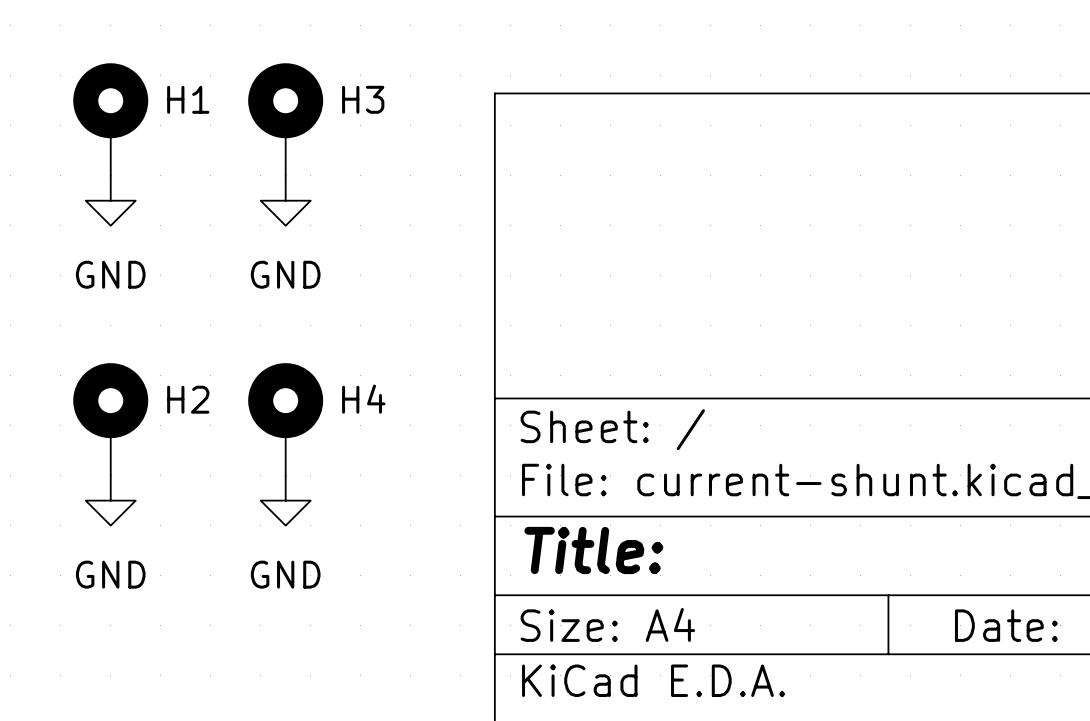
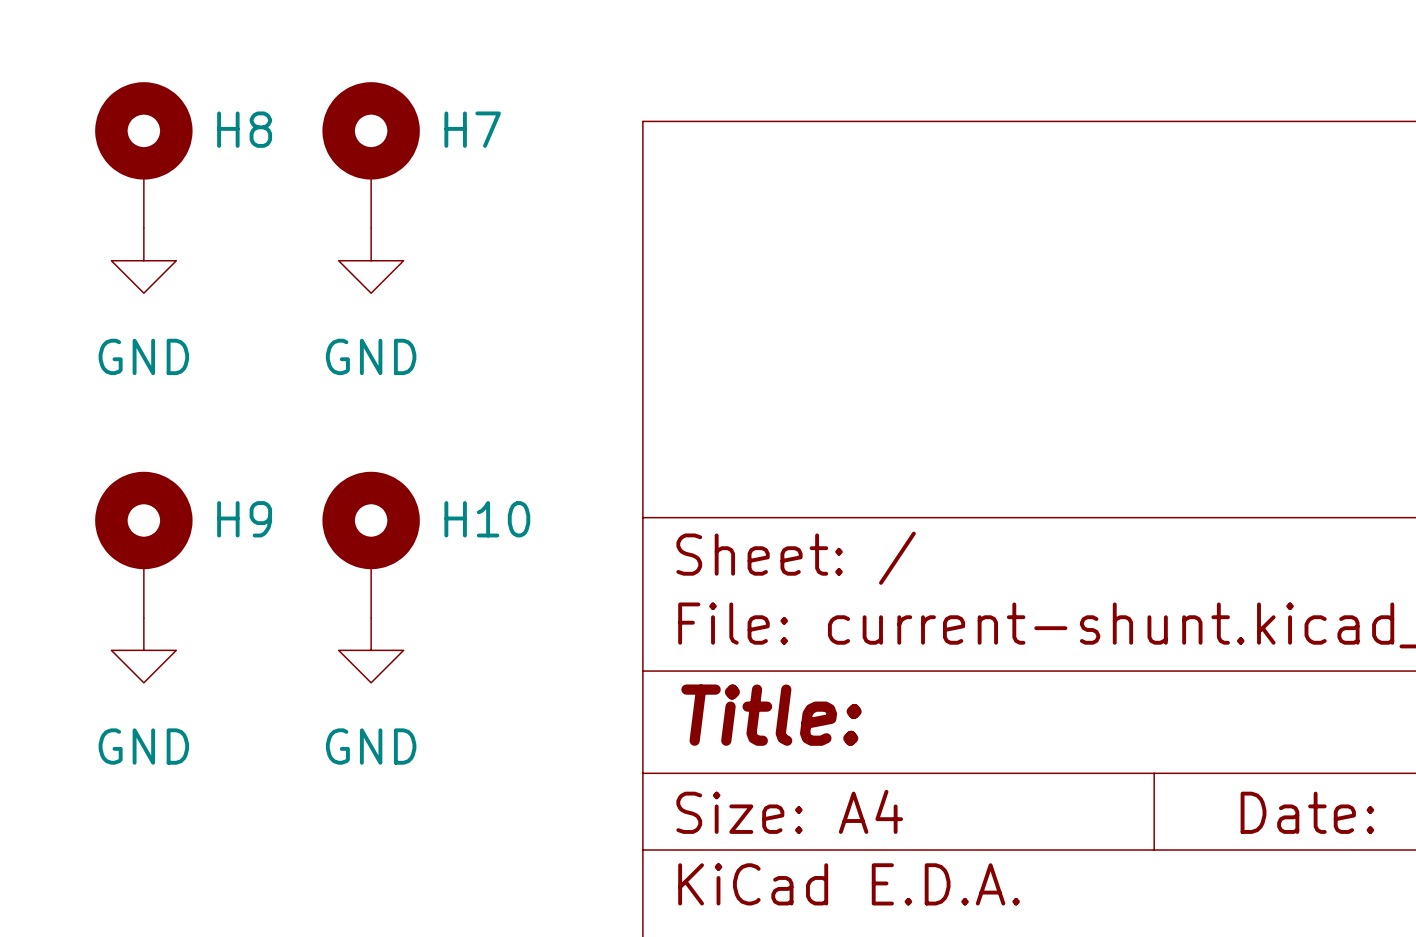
H1 name: H1 (188, 99) -> H8 (244, 129)
H3 name: H3 (363, 99) -> H7 (472, 129)
H2 name: H2 (188, 399) -> H9 (244, 519)
H4 name: H4 (363, 399) -> H10 (487, 519)

